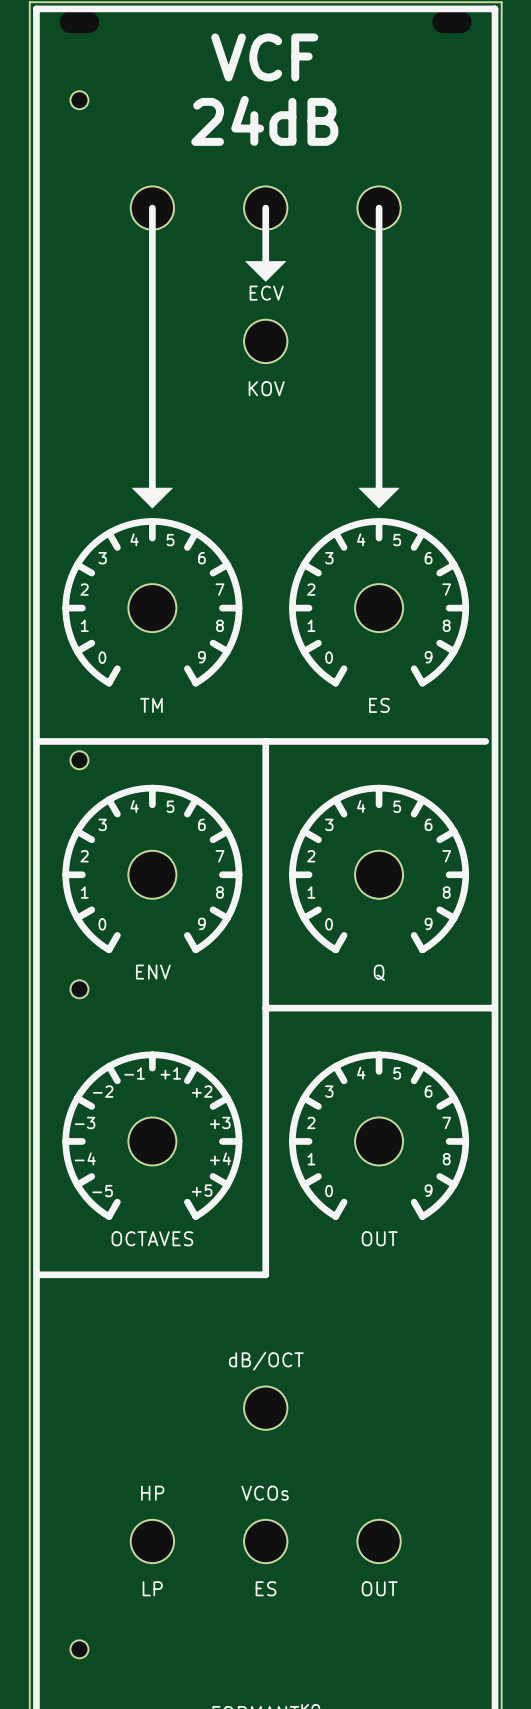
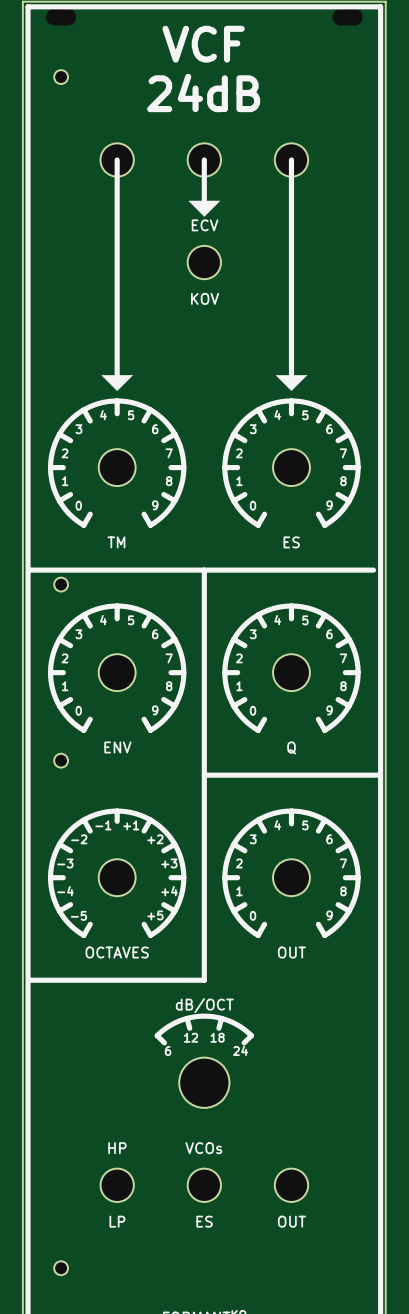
text position: dB/OCT (266, 1361) -> dB/OCT (204, 1005)
part: none -> (204, 1060)
part: (265, 1408) -> none

